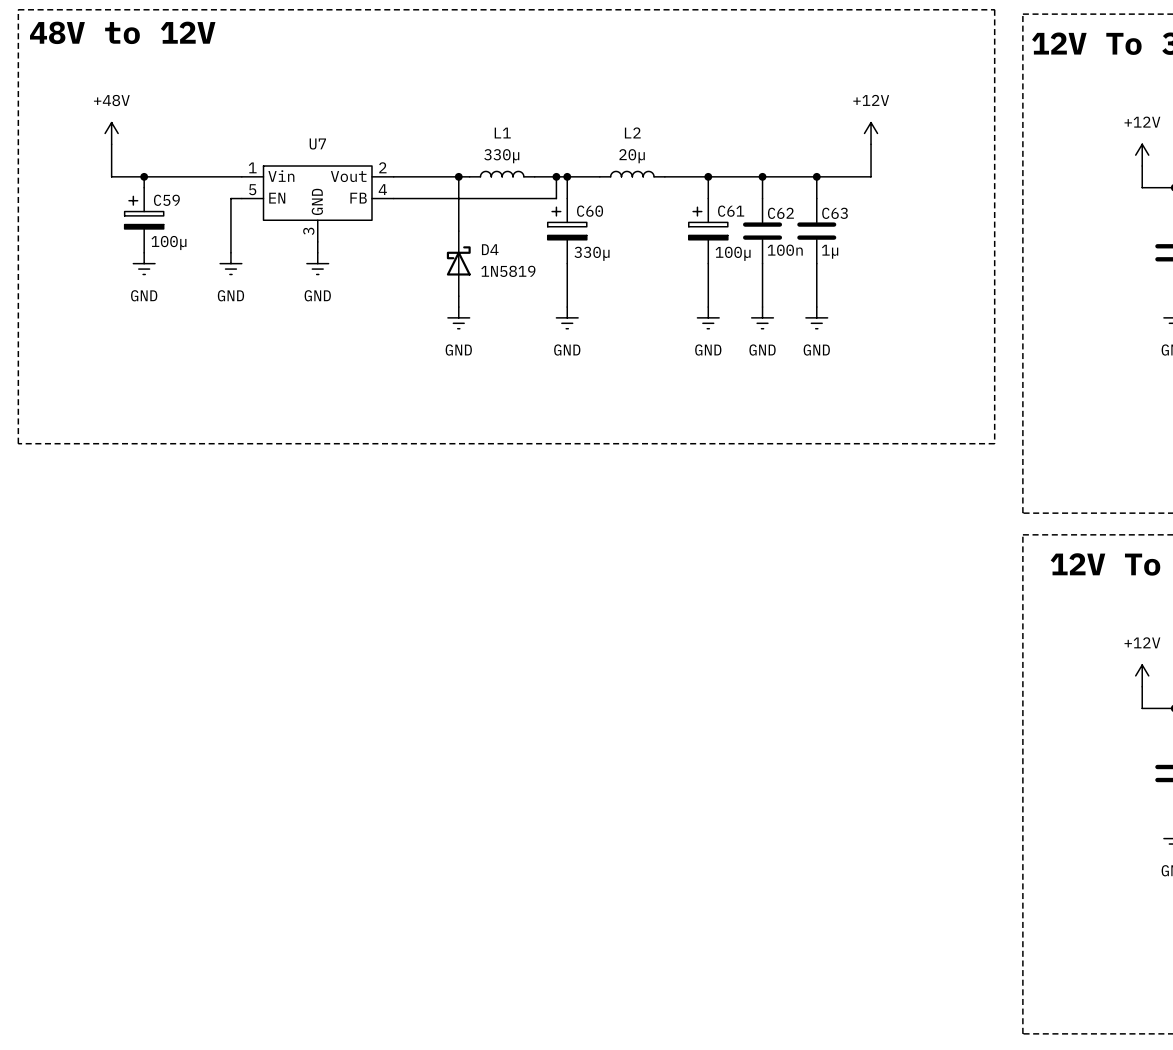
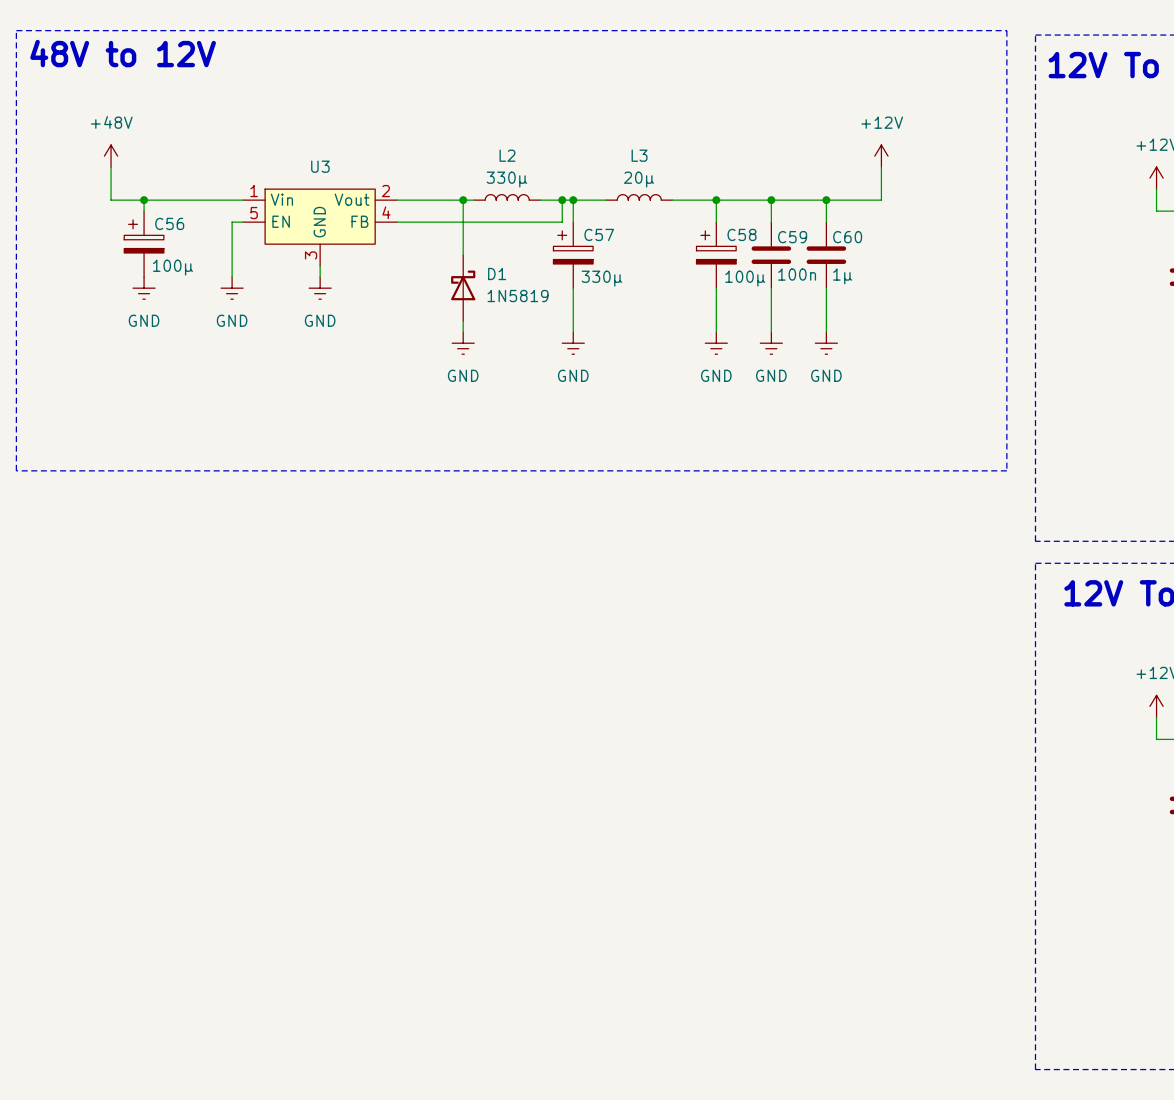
L2 name: L2 (632, 132) -> L3 (639, 155)
L1 name: L1 (502, 133) -> L2 (507, 155)
U7 name: U7 (317, 143) -> U3 (320, 166)
C59 name: C59 (166, 200) -> C56 (169, 223)
C60 name: C60 (590, 211) -> C57 (599, 234)
C61 name: C61 (731, 211) -> C58 (741, 234)
C62 name: C62 (780, 213) -> C59 (792, 237)
C63 name: C63 (835, 213) -> C60 (847, 237)
D4 name: D4 (490, 249) -> D1 (497, 274)

